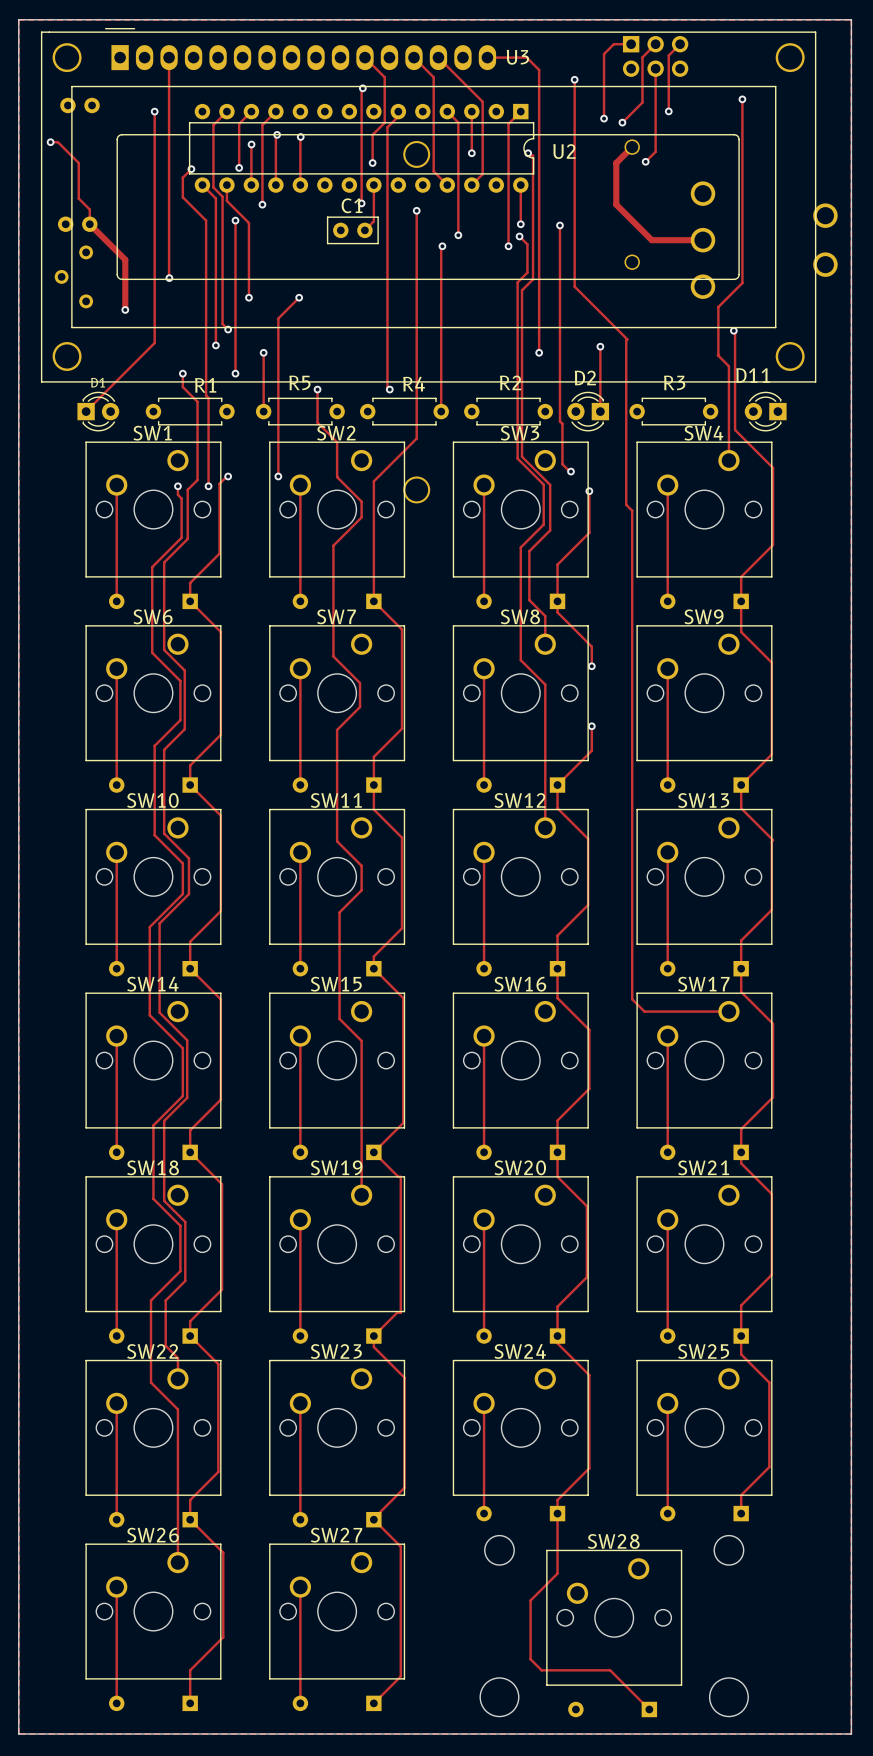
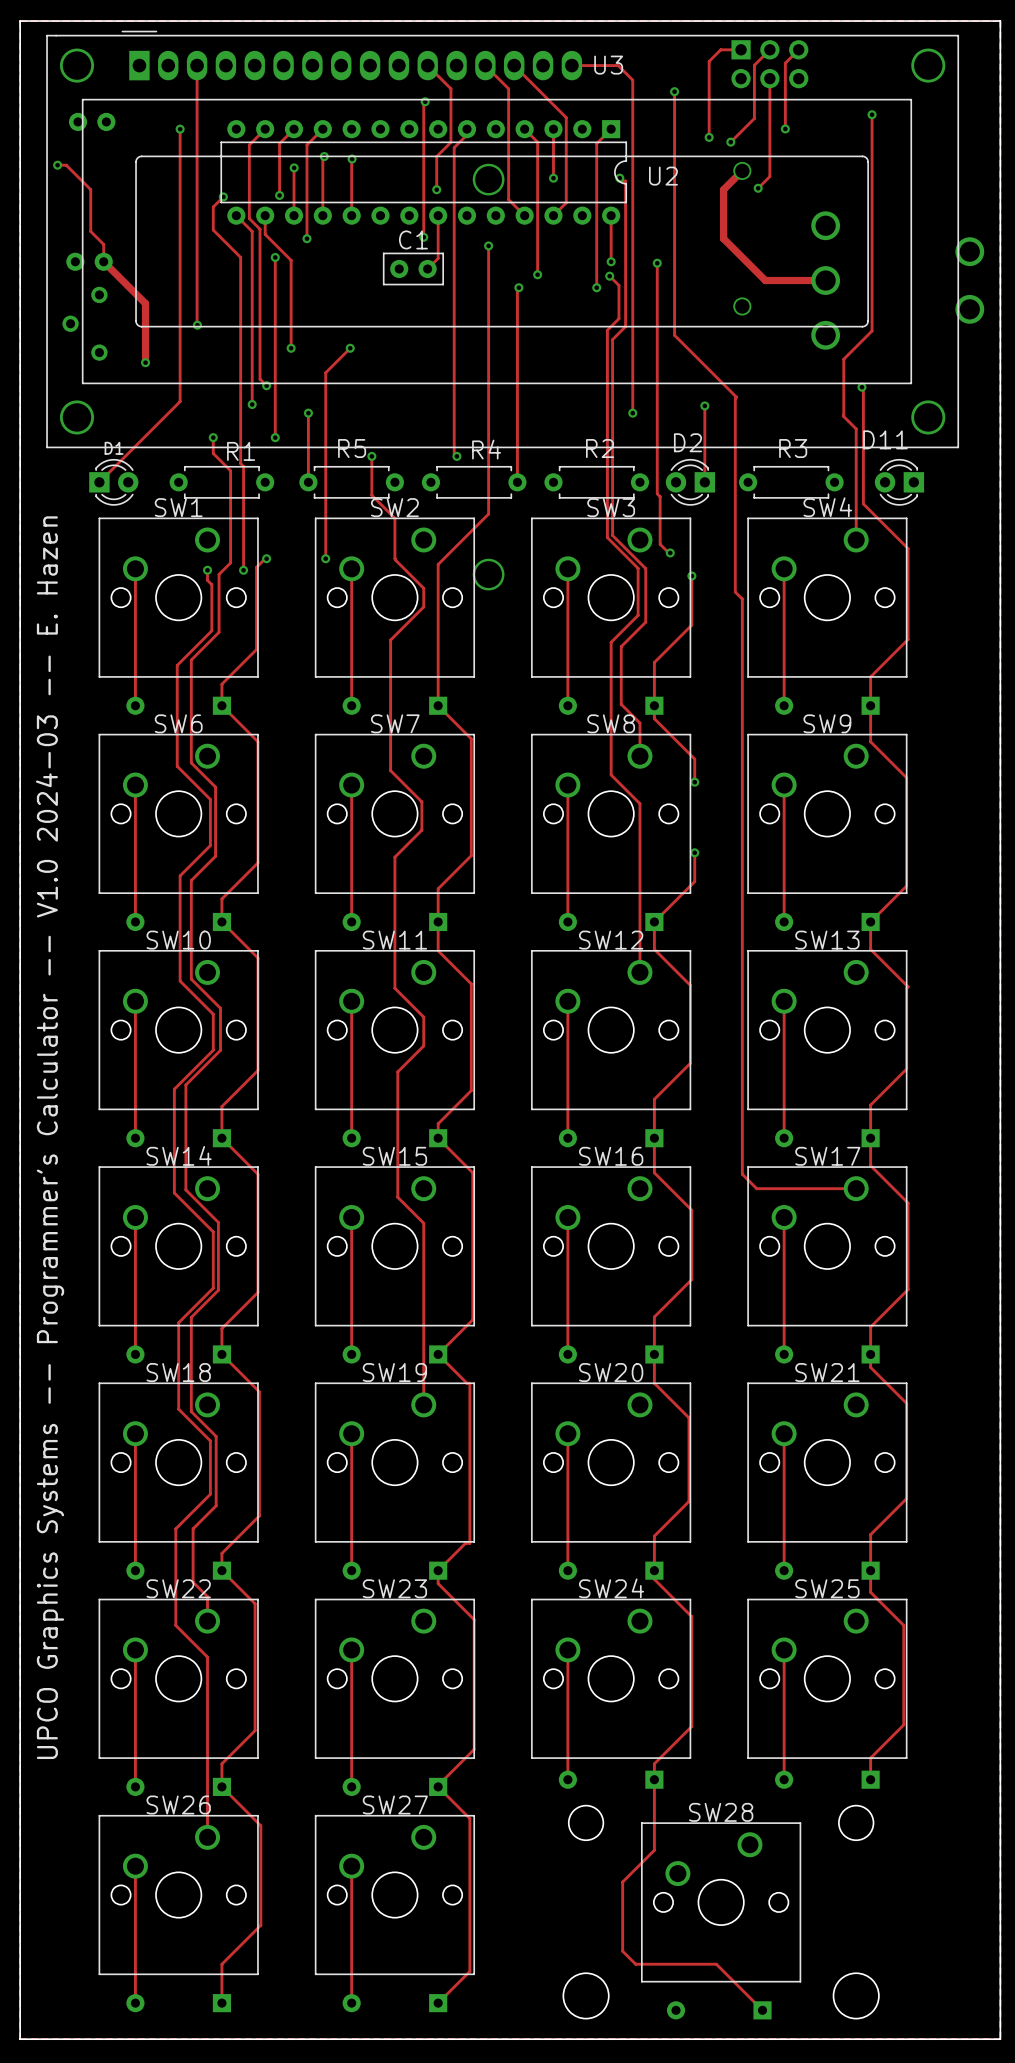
text: none -> UPCO Graphics Systems -- Programmer's Calculator -- V1.0 2024-03 -- E. Hazen (50, 1137)

